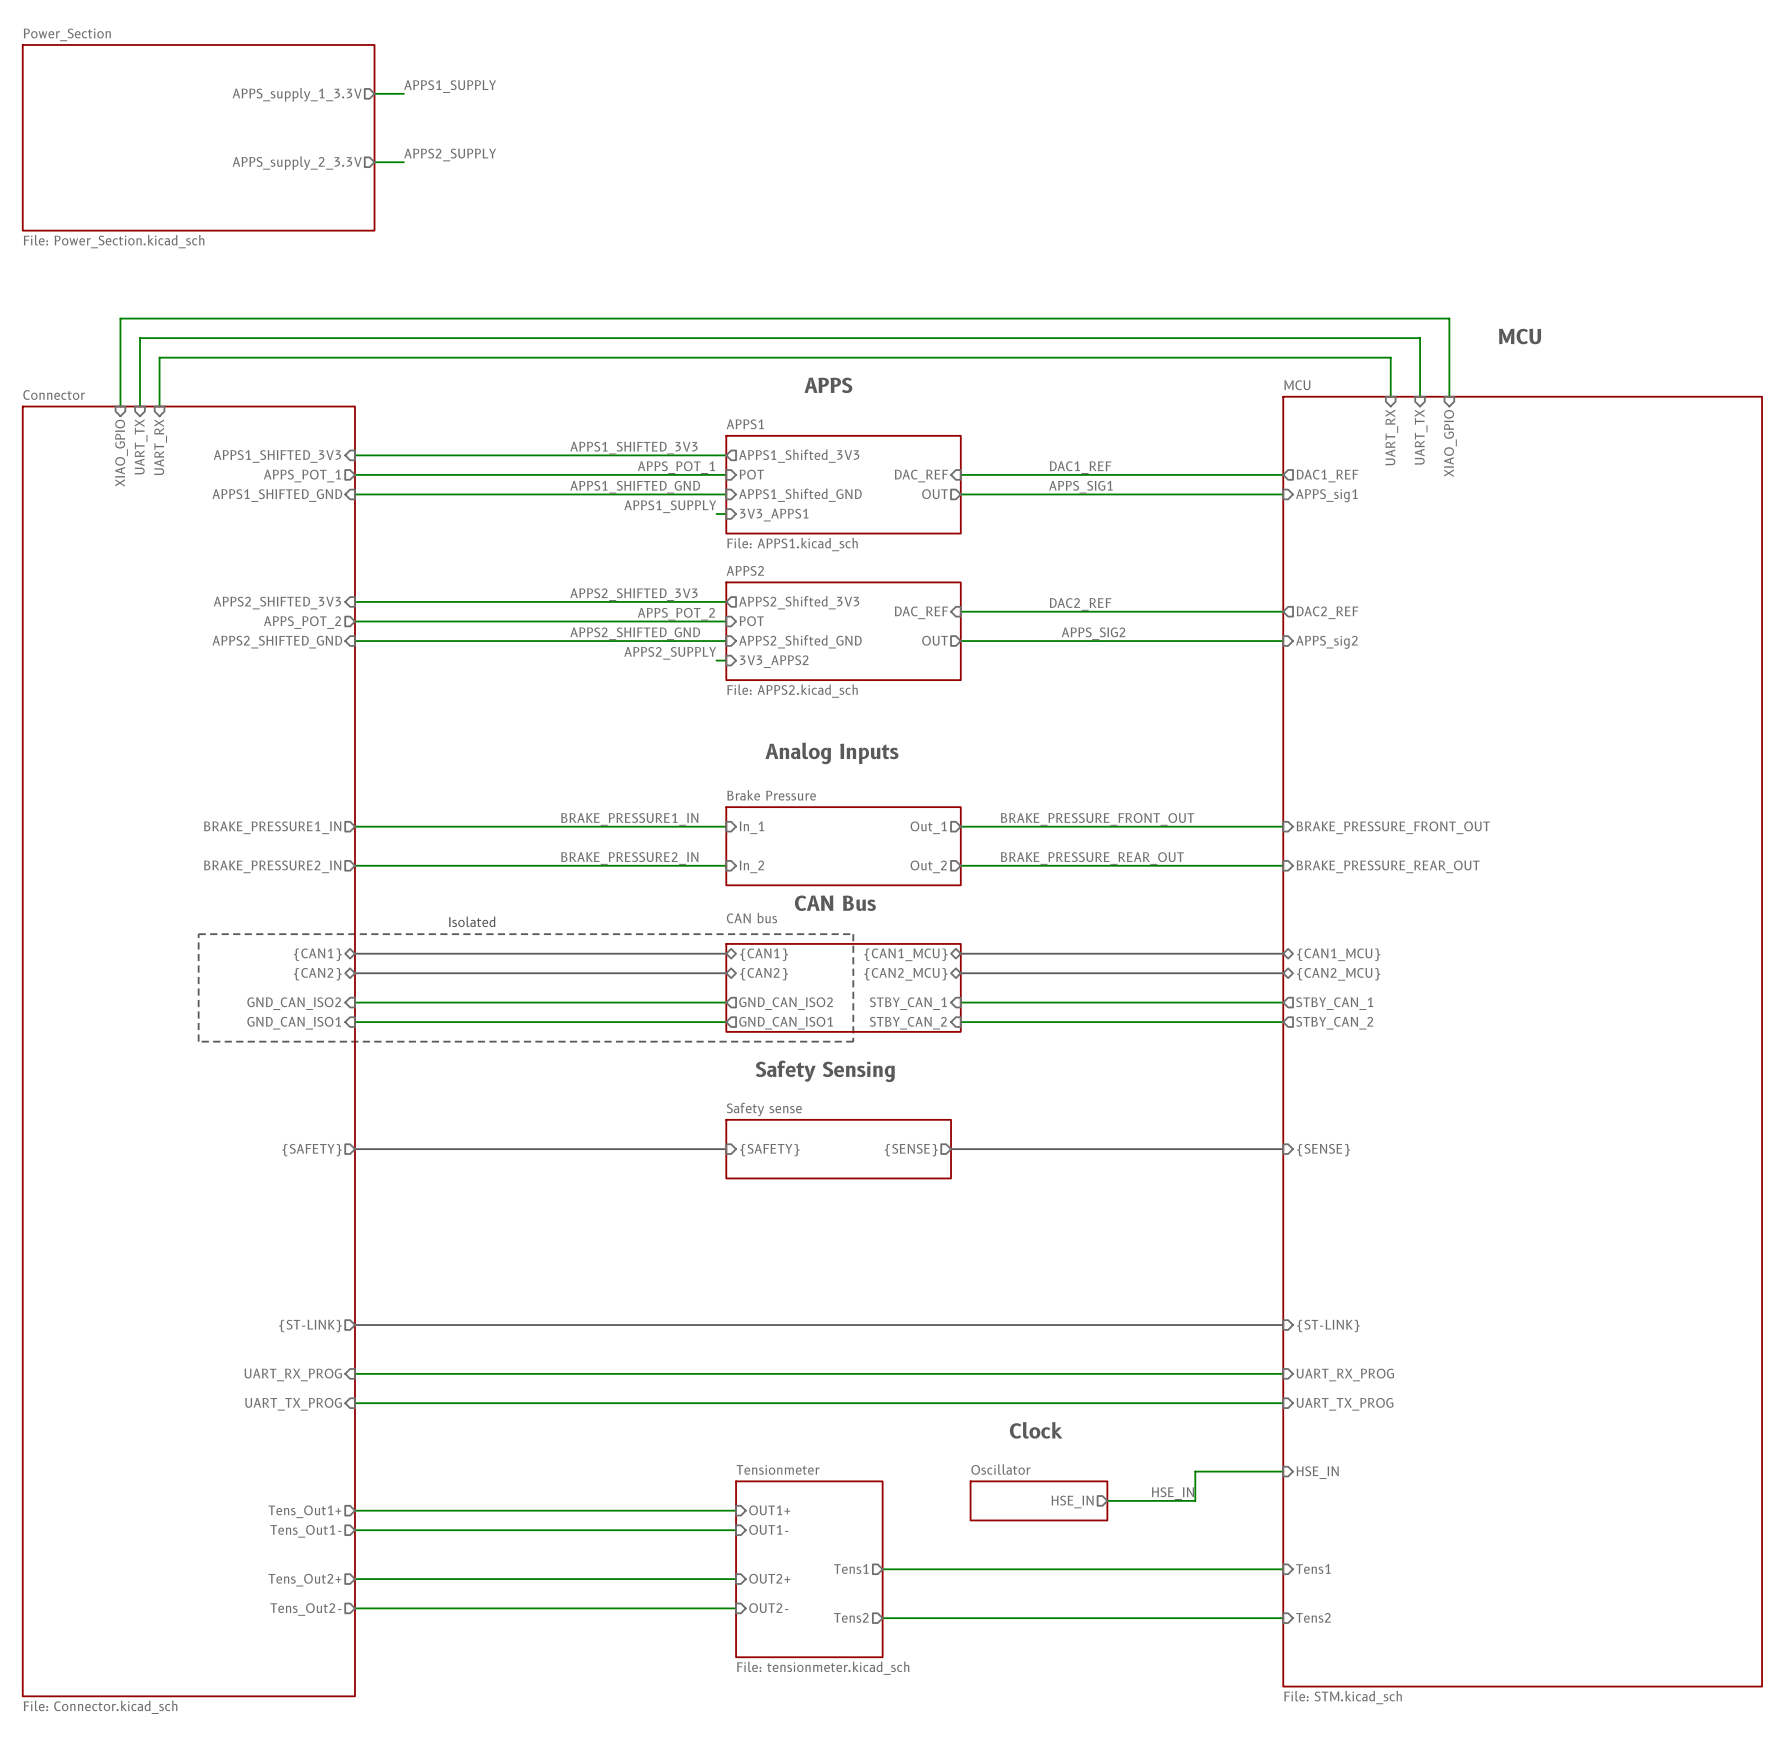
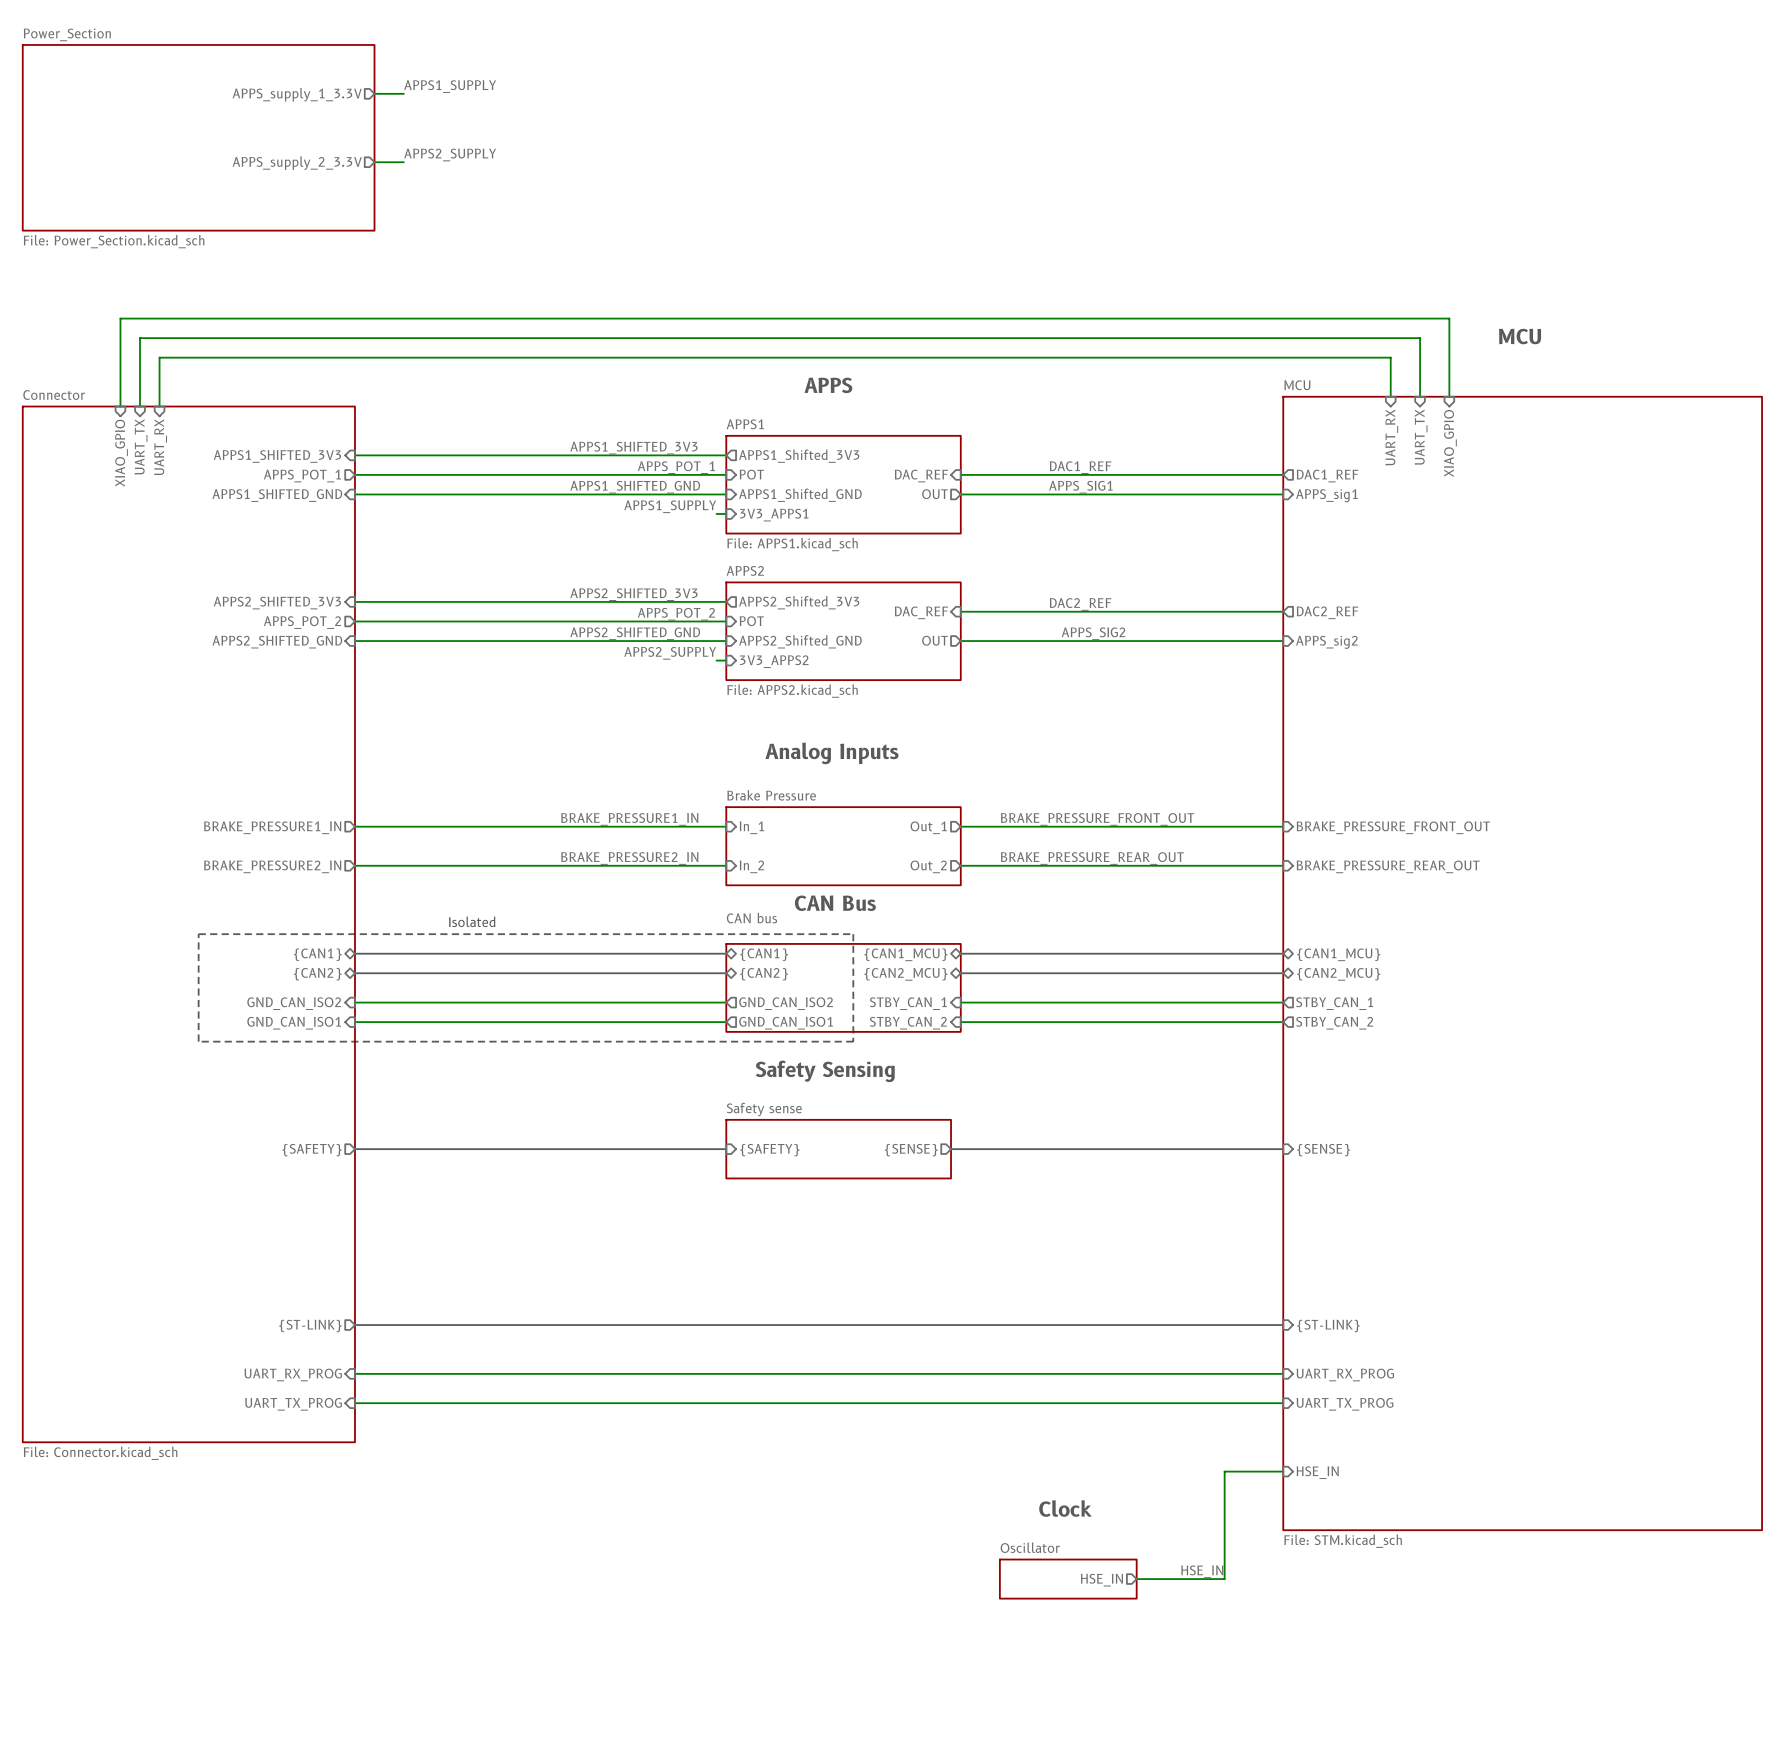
sheet Connector: none -> File: Connector.kicad_sch (188, 924)
sheet MCU: none -> File: STM.kicad_sch (1522, 963)
sheet MCU: File: STM.kicad_sch (1522, 1041) -> none
sheet Connector: File: Connector.kicad_sch (188, 1051) -> none
text position: Clock (1036, 1430) -> Clock (1065, 1508)
wire: (1224, 1471) (1195, 1471) (1195, 1500) (1107, 1500) -> (1224, 1471) (1224, 1579) (1136, 1579)
label position: HSE_IN (1172, 1493) -> HSE_IN (1202, 1571)
sheet Oscillator position: (1038, 1500) -> (1068, 1579)
sheet pin position: HSE_IN (1072, 1502) -> HSE_IN (1101, 1580)
wire: (354, 1510) (736, 1510) -> none
sheet pin: OUT1+ (769, 1510) -> none
sheet pin: Tens_Out1+ (304, 1511) -> none
sheet pin: OUT1- (768, 1529) -> none
wire: (354, 1530) (736, 1530) -> none
sheet pin: Tens_Out1- (305, 1531) -> none
sheet pin: Tens1 (851, 1568) -> none
sheet pin: Tens1 (1313, 1568) -> none
sheet Tensionmeter: File: tensionmeter.kicad_sch (809, 1569) -> none
wire: (882, 1569) (1283, 1569) -> none
sheet pin: OUT2+ (769, 1578) -> none
wire: (354, 1579) (736, 1579) -> none
sheet pin: Tens_Out2+ (304, 1580) -> none
wire: (354, 1608) (736, 1608) -> none
sheet pin: OUT2- (768, 1608) -> none
sheet pin: Tens_Out2- (305, 1609) -> none
sheet pin: Tens2 (851, 1617) -> none
sheet pin: Tens2 (1313, 1617) -> none
wire: (882, 1618) (1283, 1618) -> none

